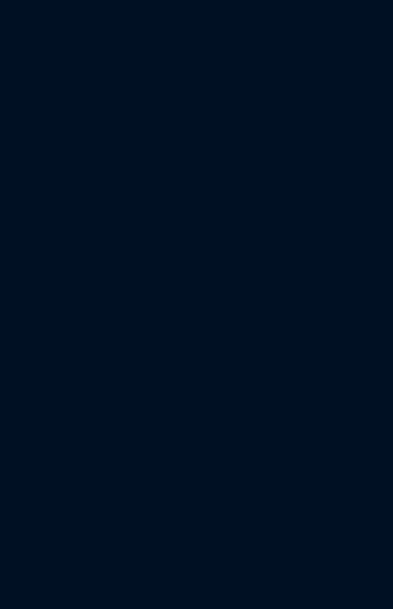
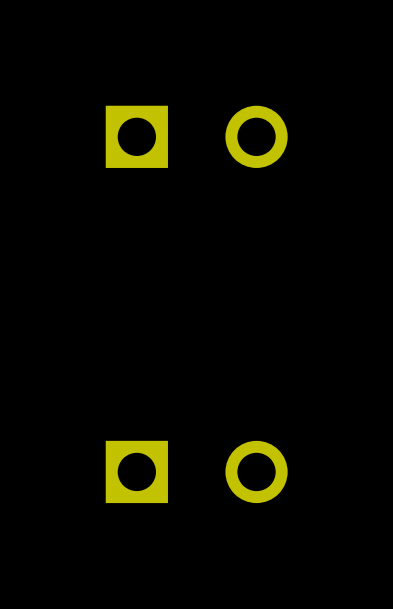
part: none -> (196, 136)
part: none -> (196, 471)

